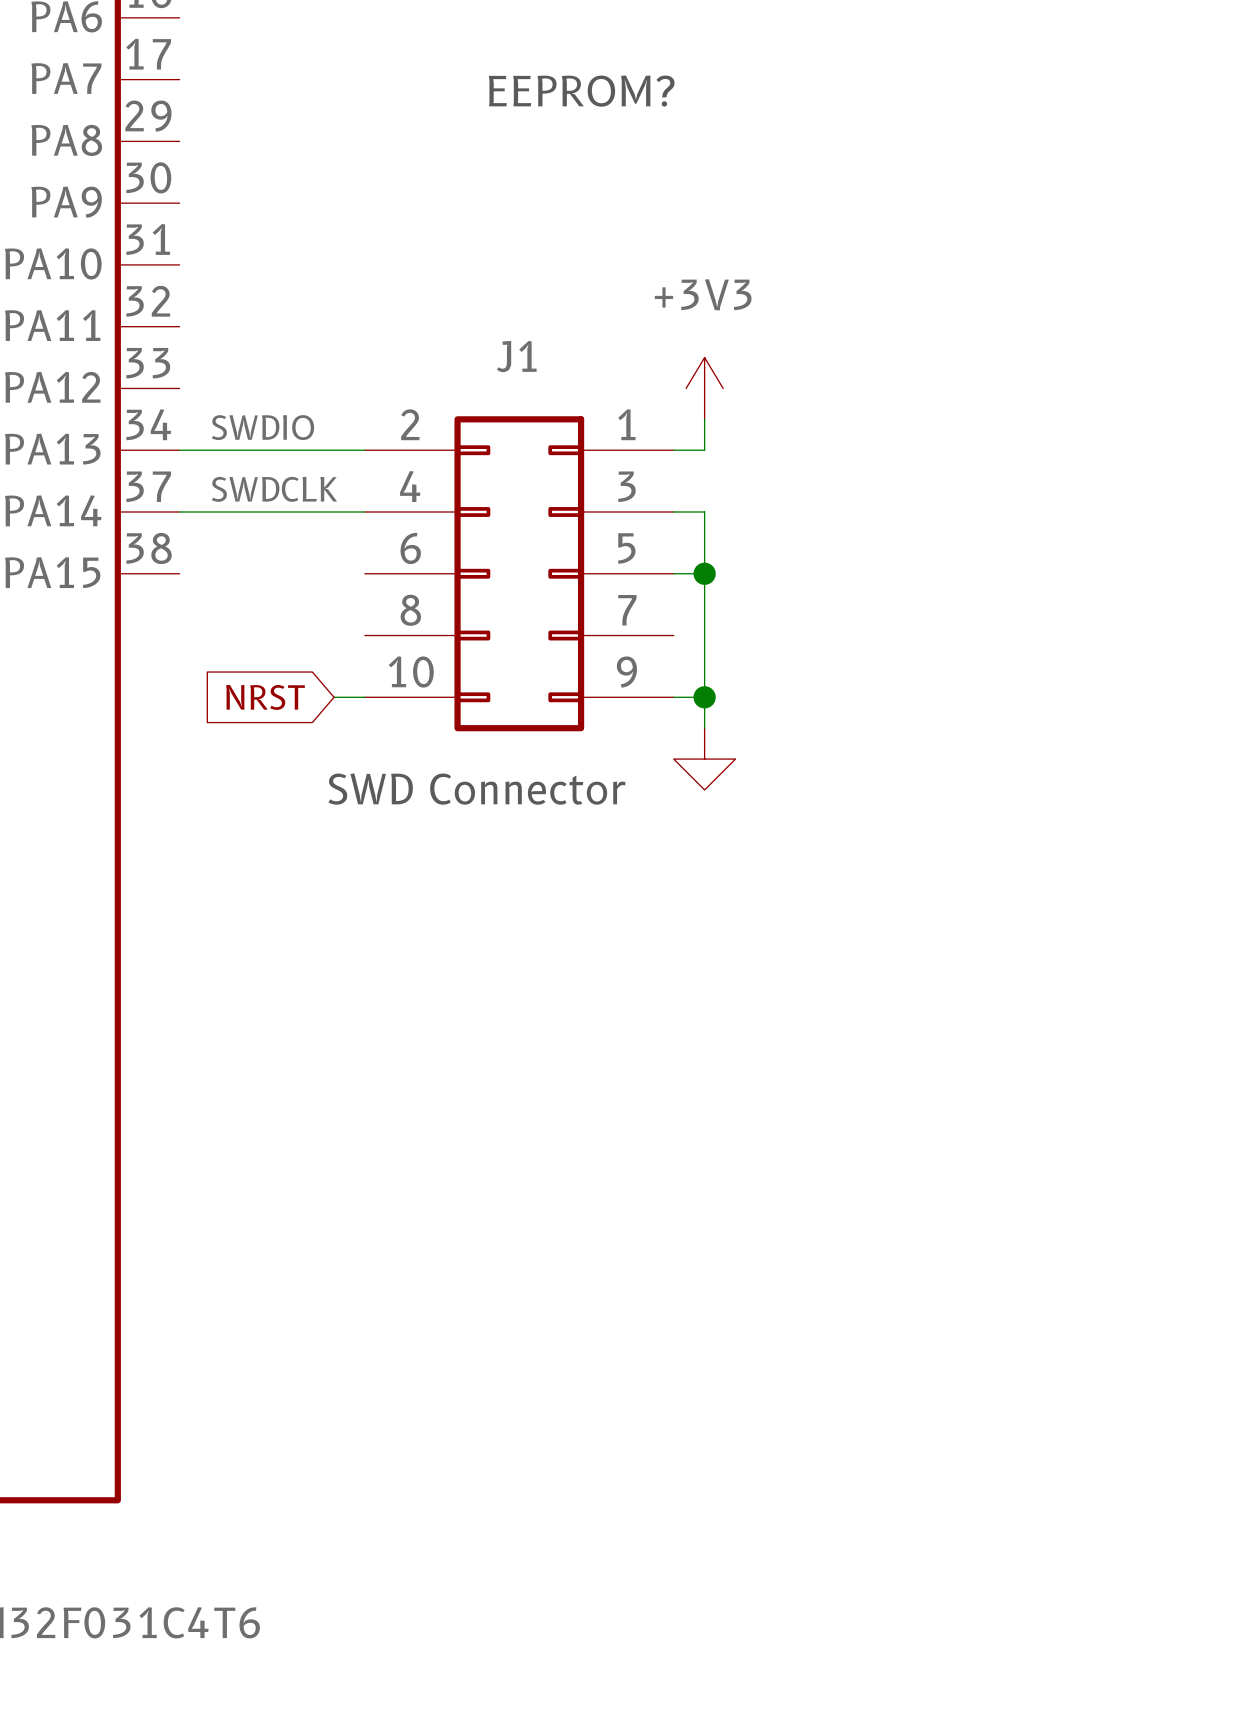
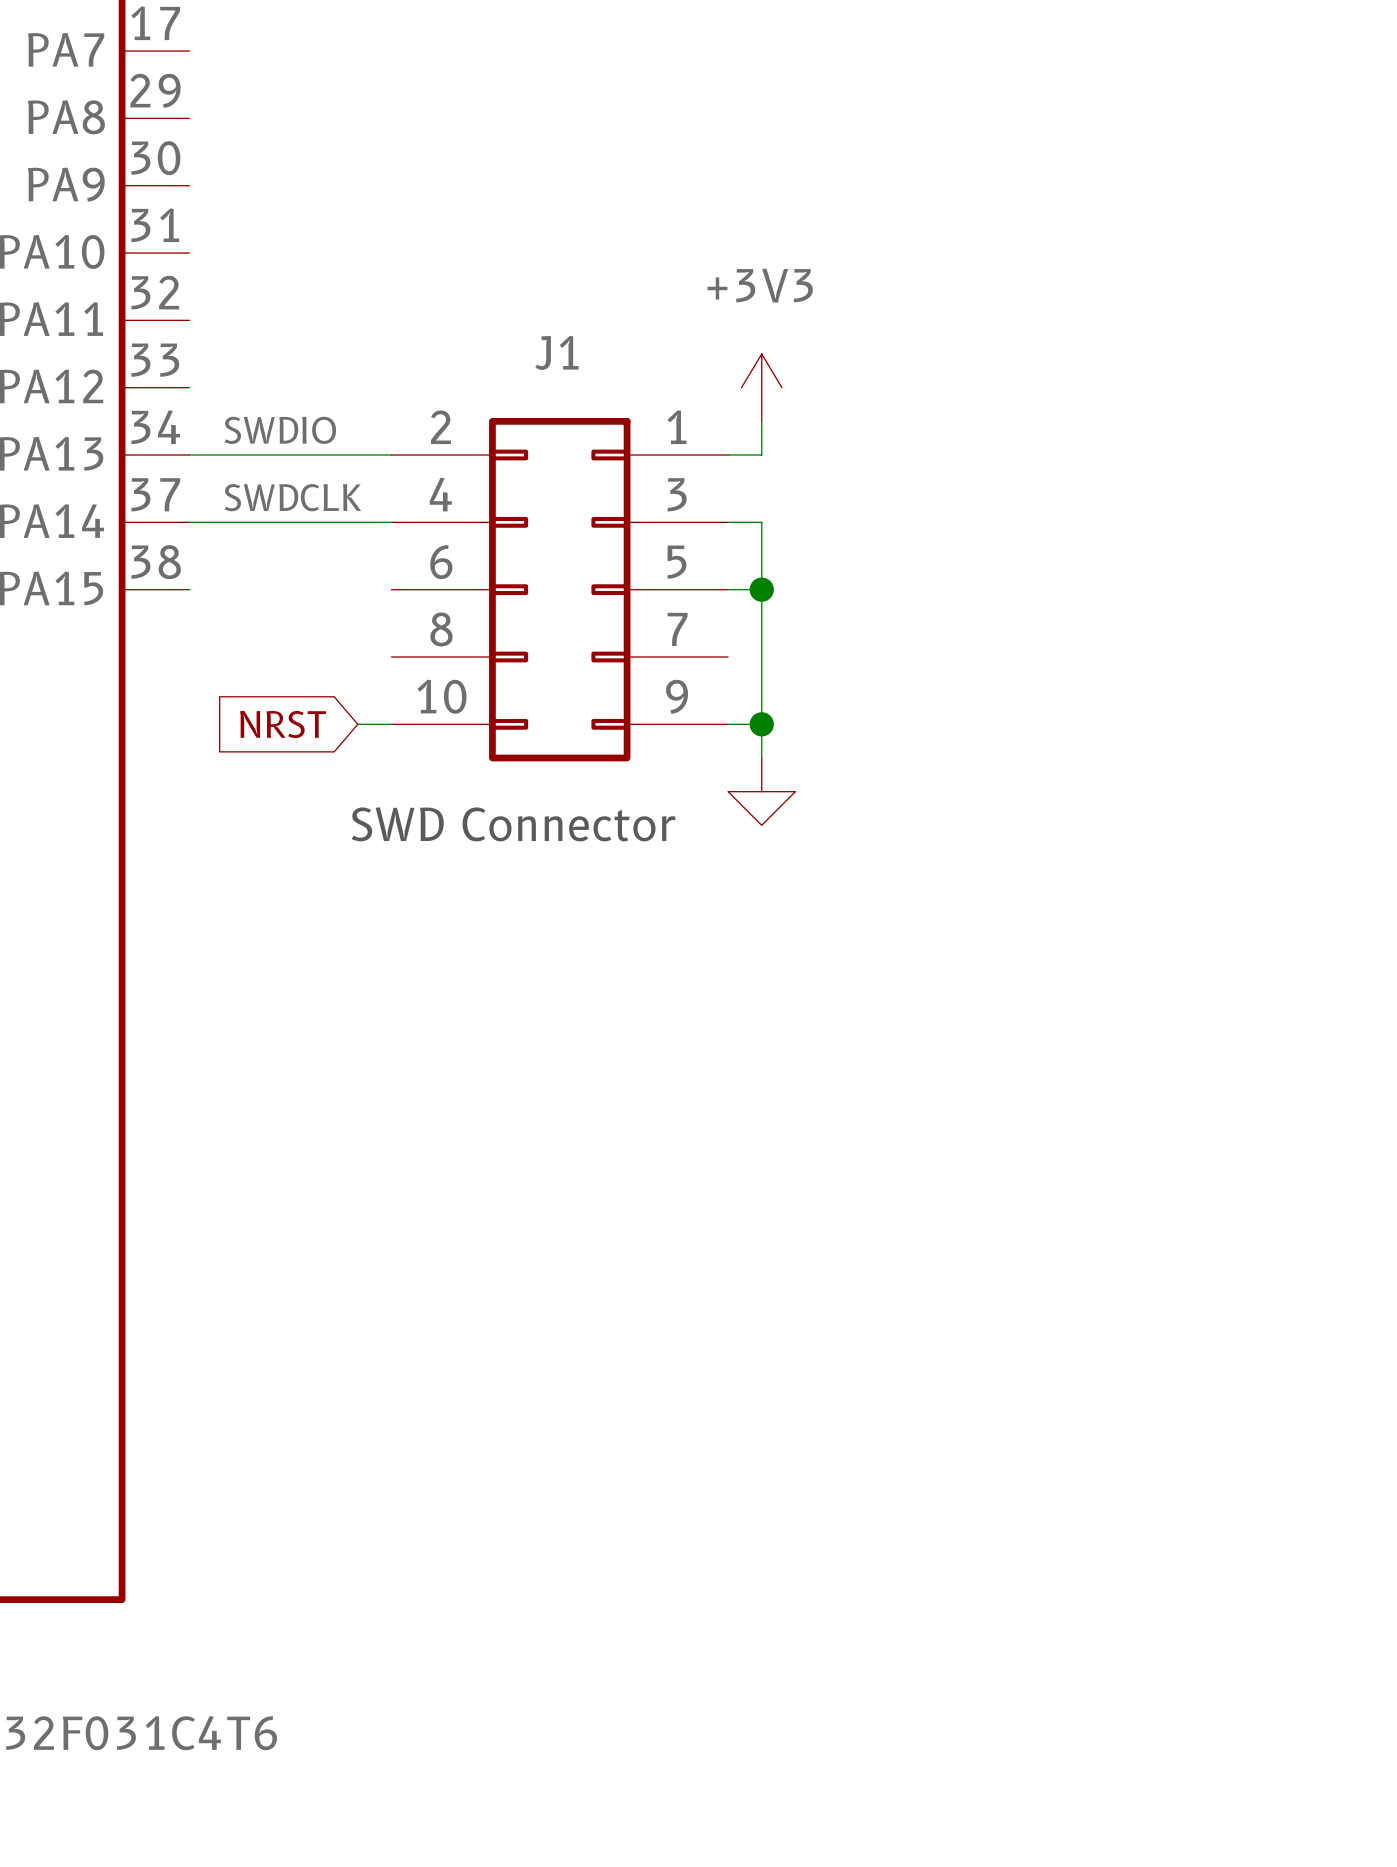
text: EEPROM? (581, 91) -> none

